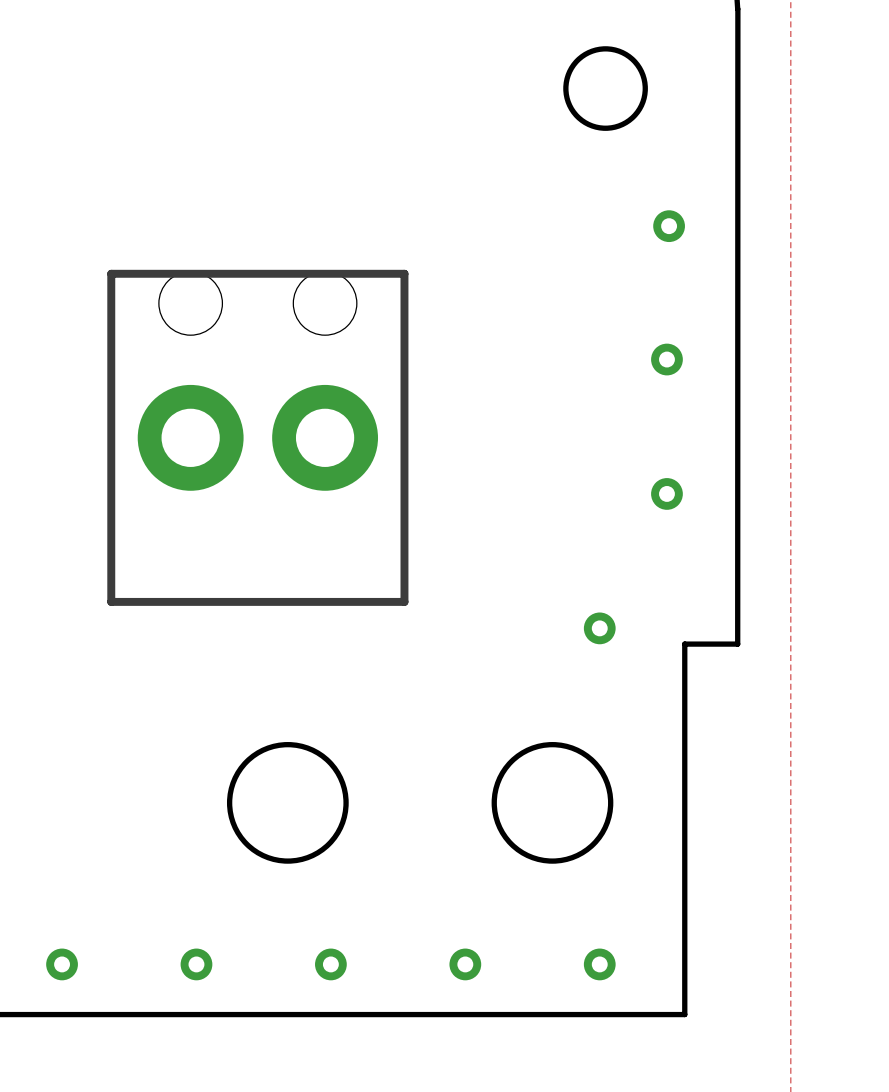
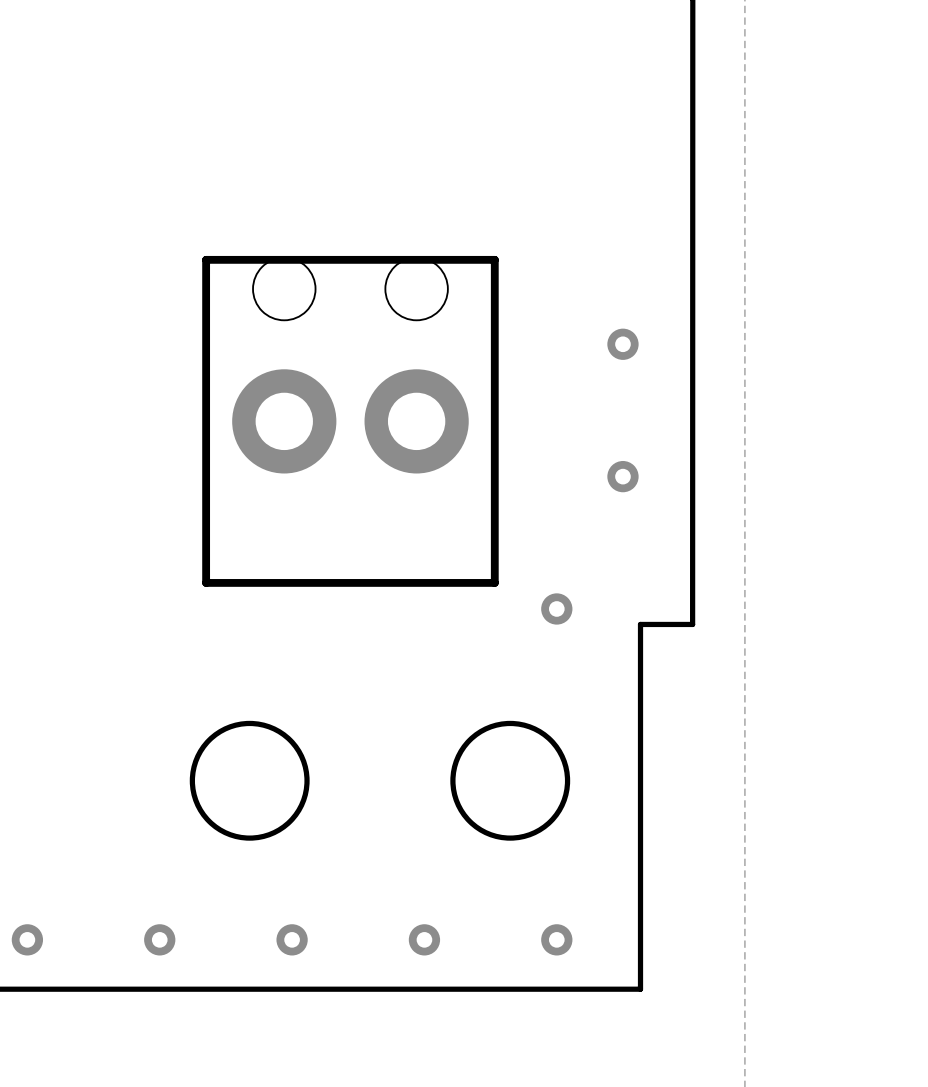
round board edge: [563, 46, 648, 131] -> none
via: (669, 226) -> none
part position: (257, 437) -> (350, 421)

